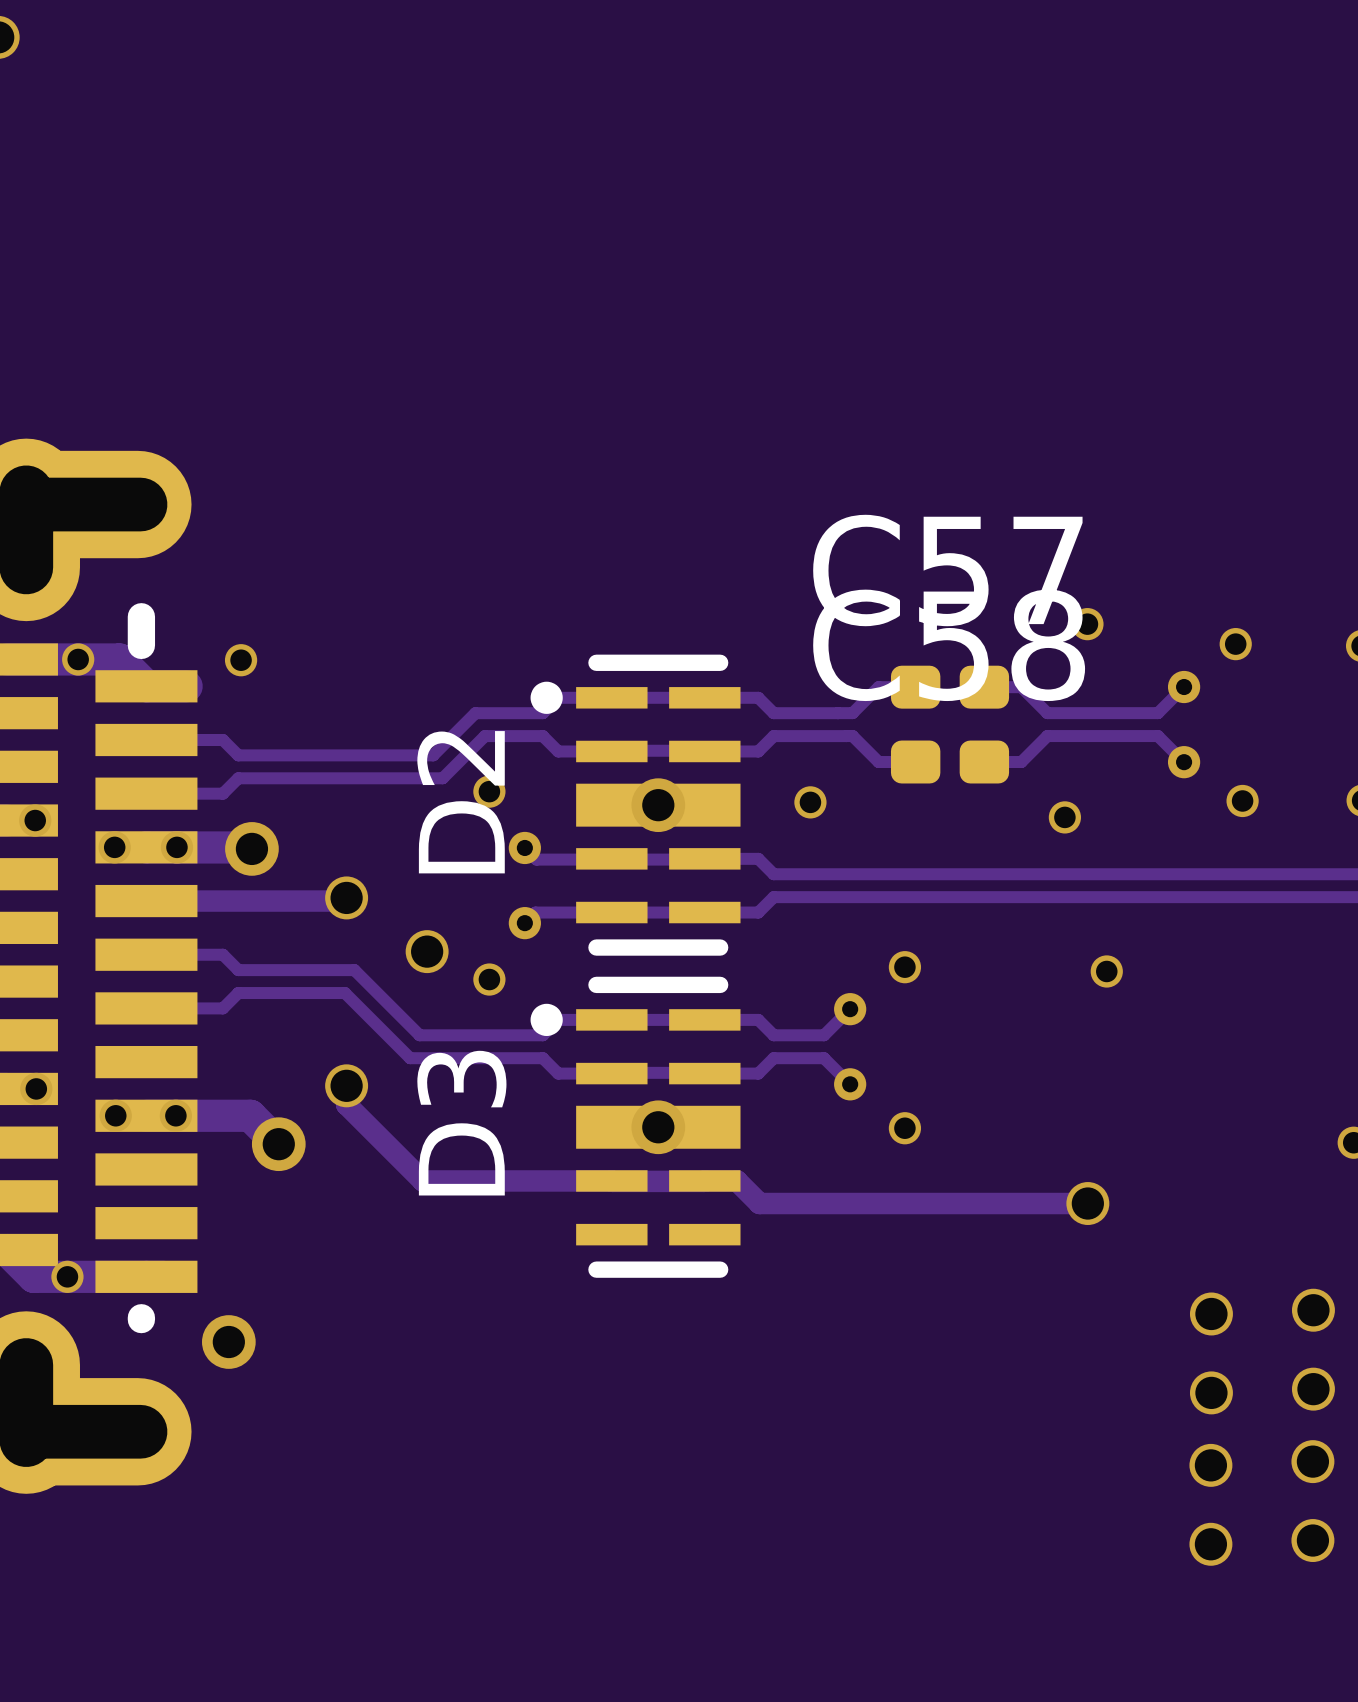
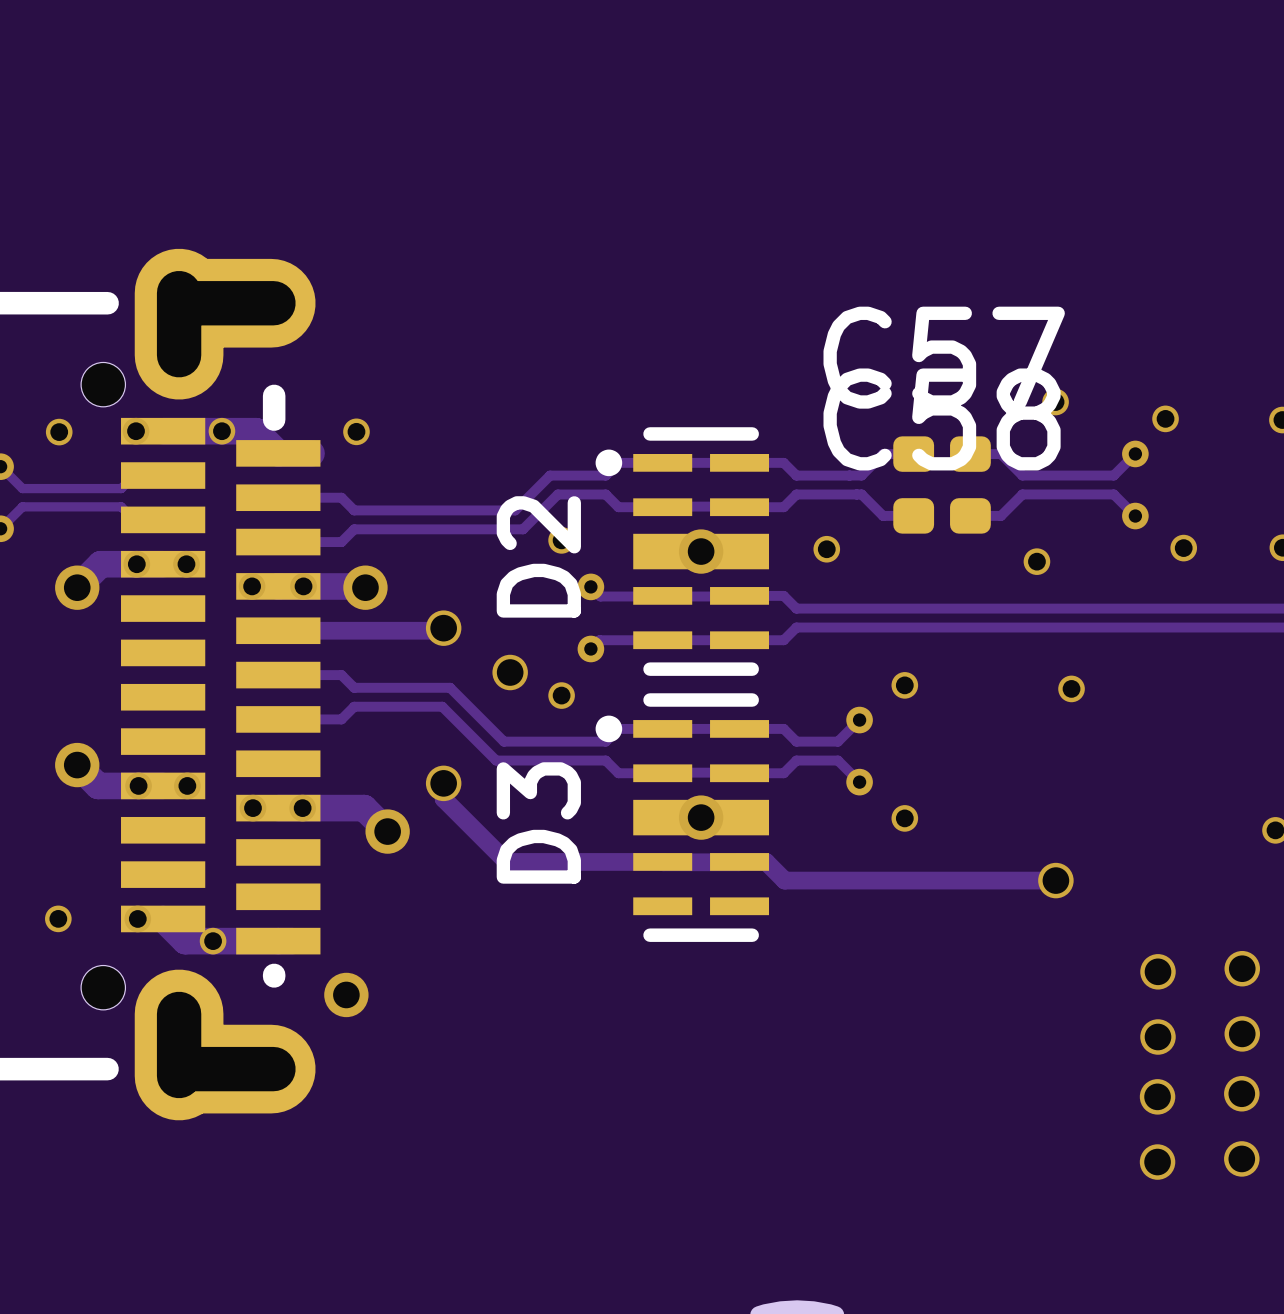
via position: (1235, 644) -> (1165, 418)

